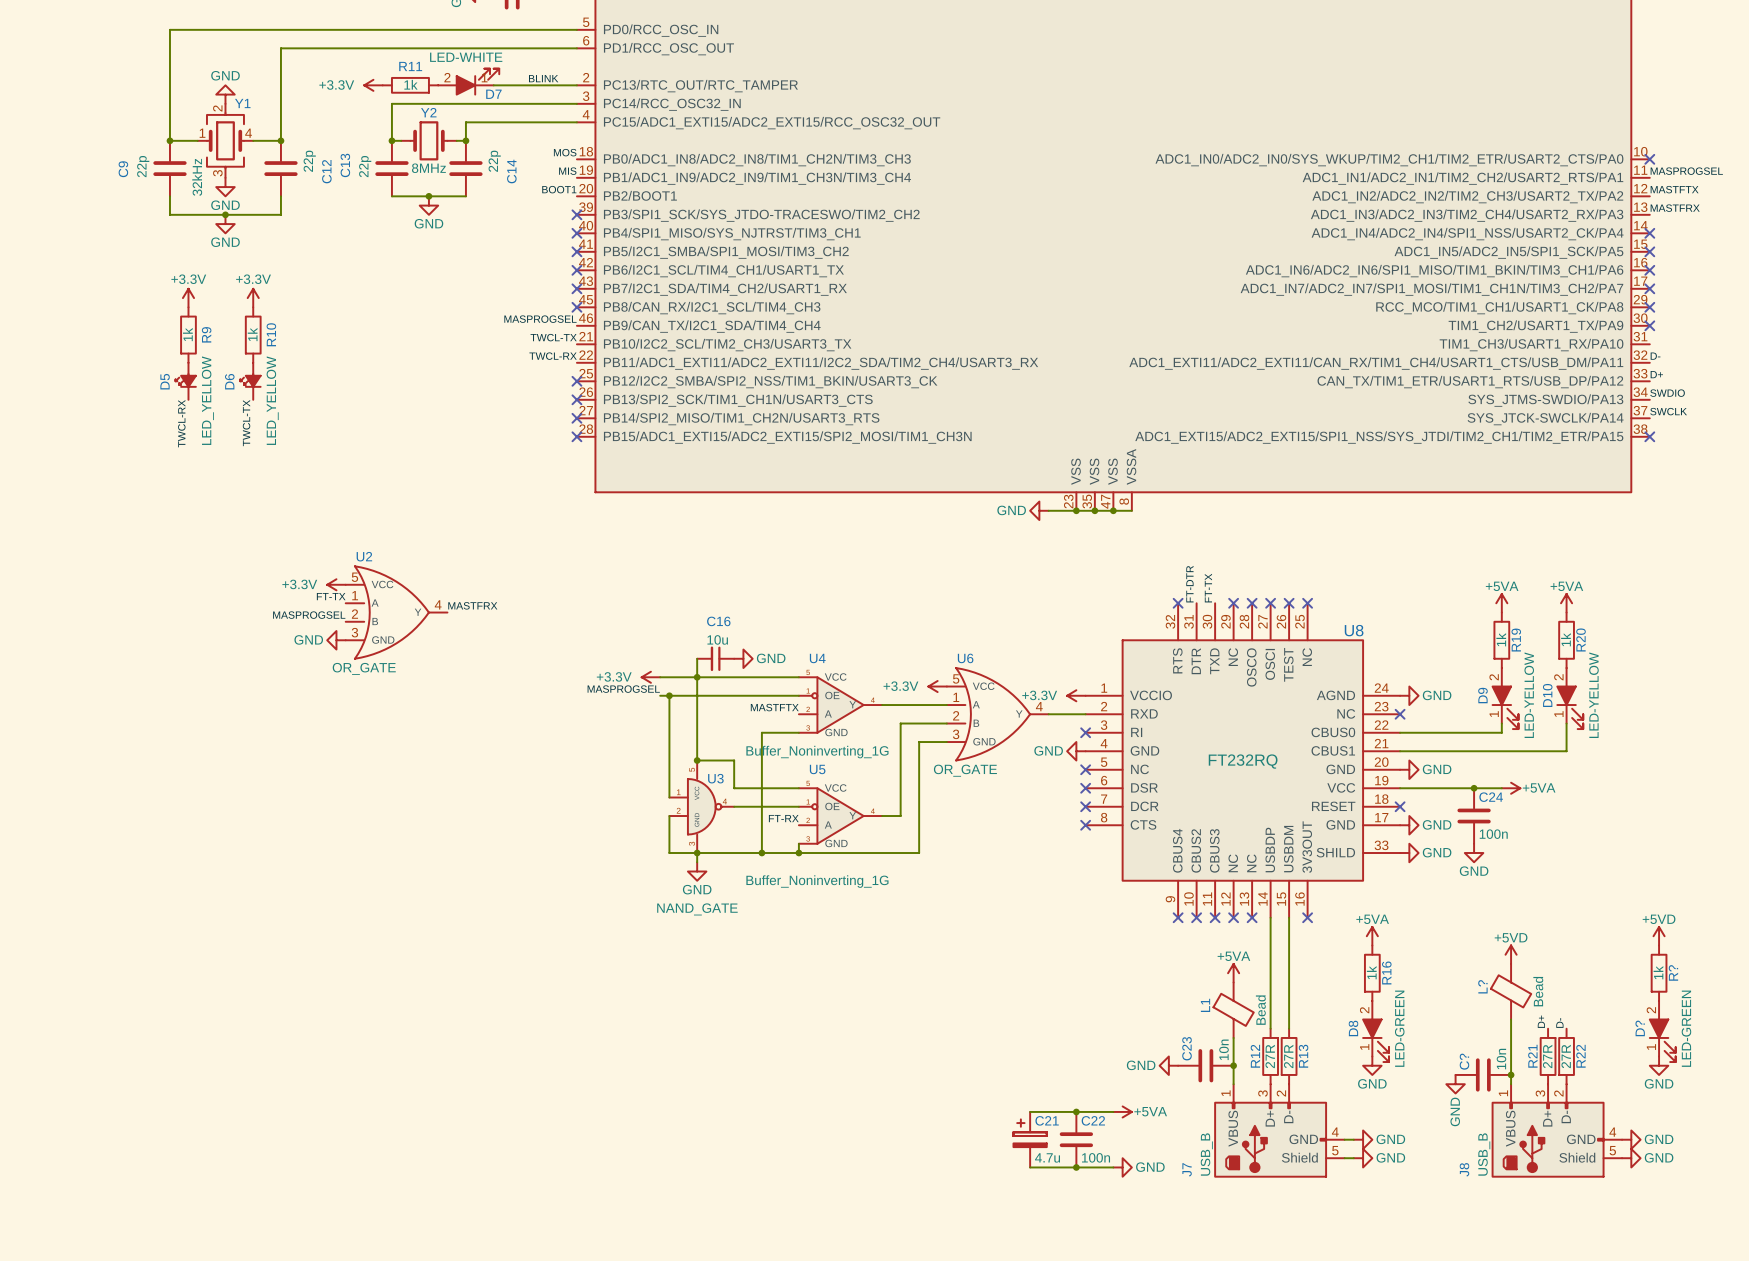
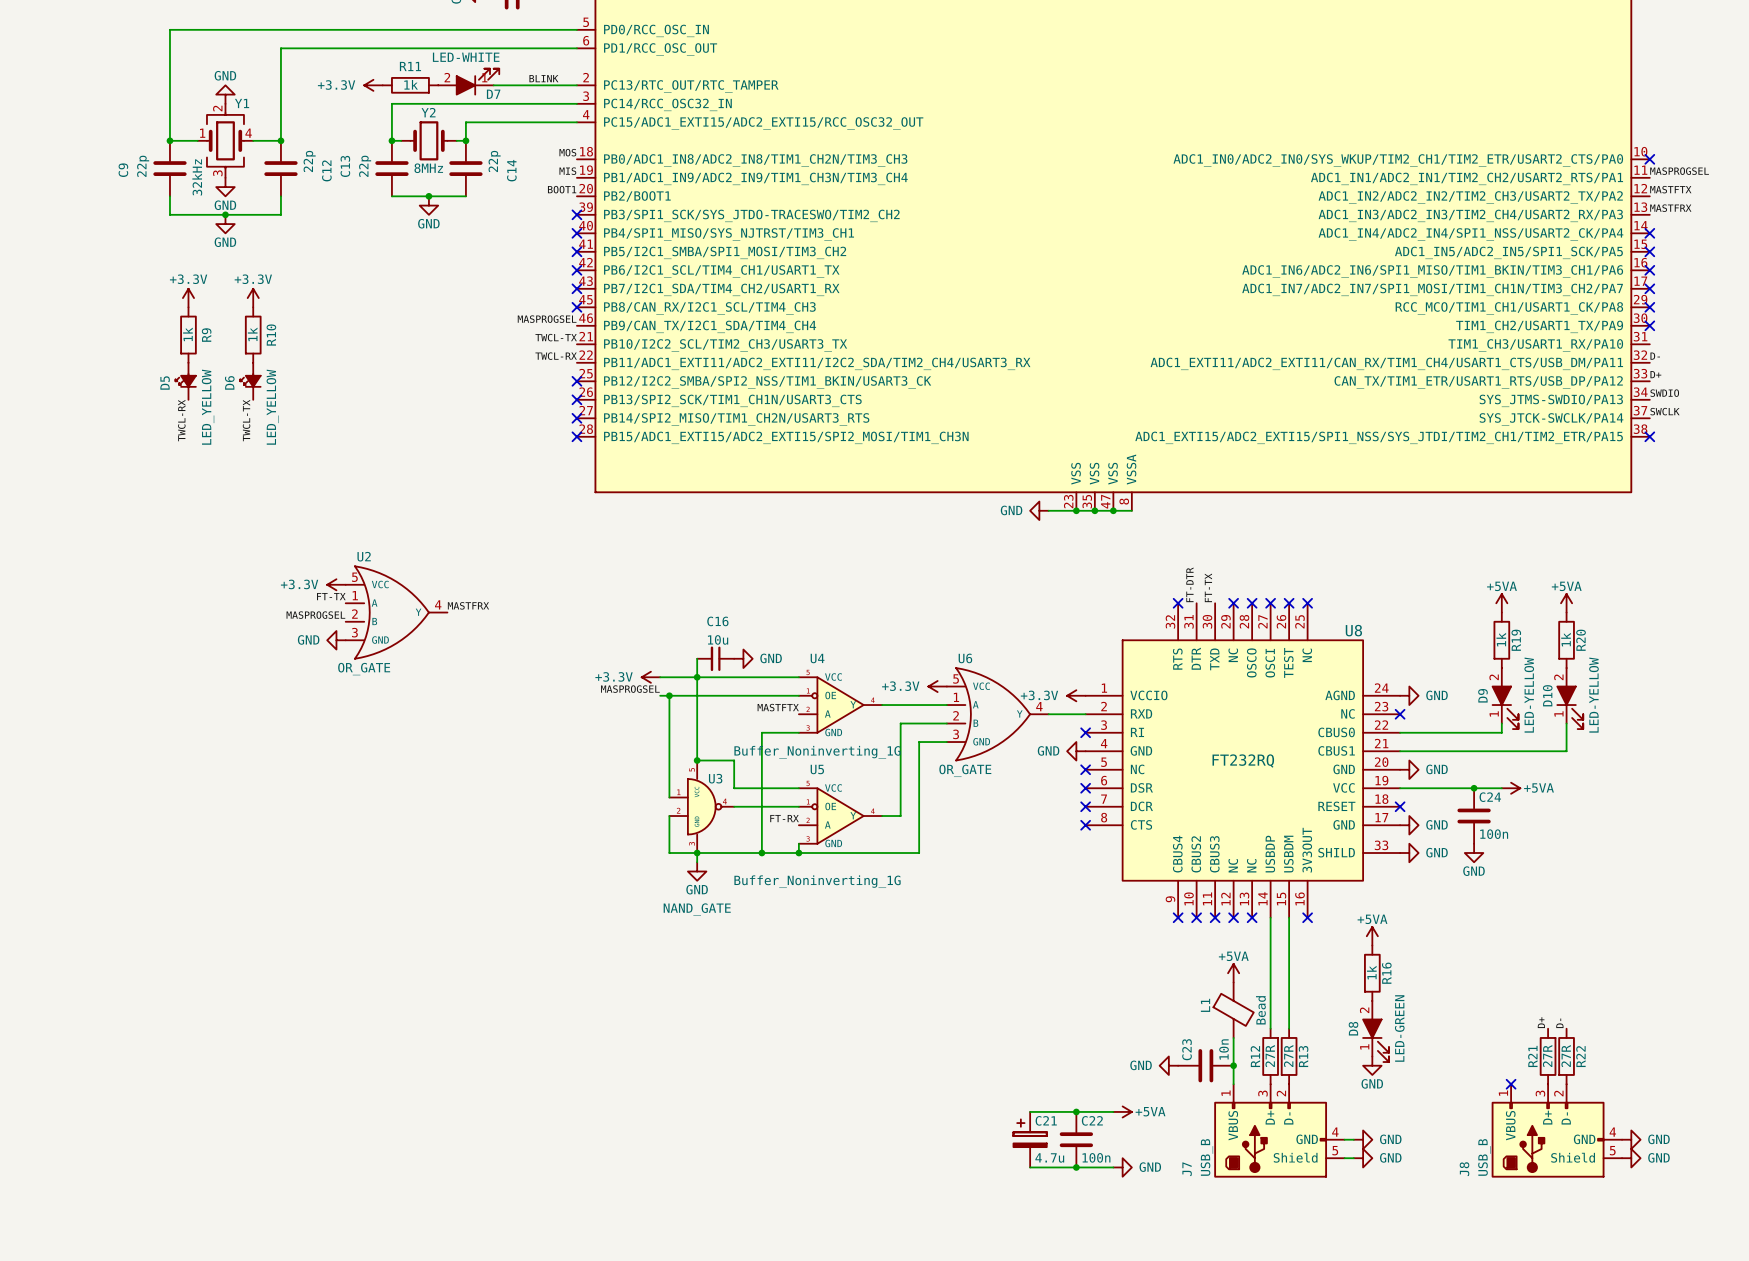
power symbol: +5VD (1659, 936) -> none
power symbol: +5VD (1511, 954) -> none
R?: 1k (1659, 973) -> none
L?: Bead (1511, 991) -> none
wire: (1511, 1019) (1511, 1084) -> none
D?: LED-GREEN (1662, 1031) -> none
power symbol: GND (1659, 1065) -> none
C?: 10n (1483, 1074) -> none
junction: (1511, 1074) -> none
power symbol: GND (1455, 1084) -> none
no-connect mark: none -> (1511, 1084)

